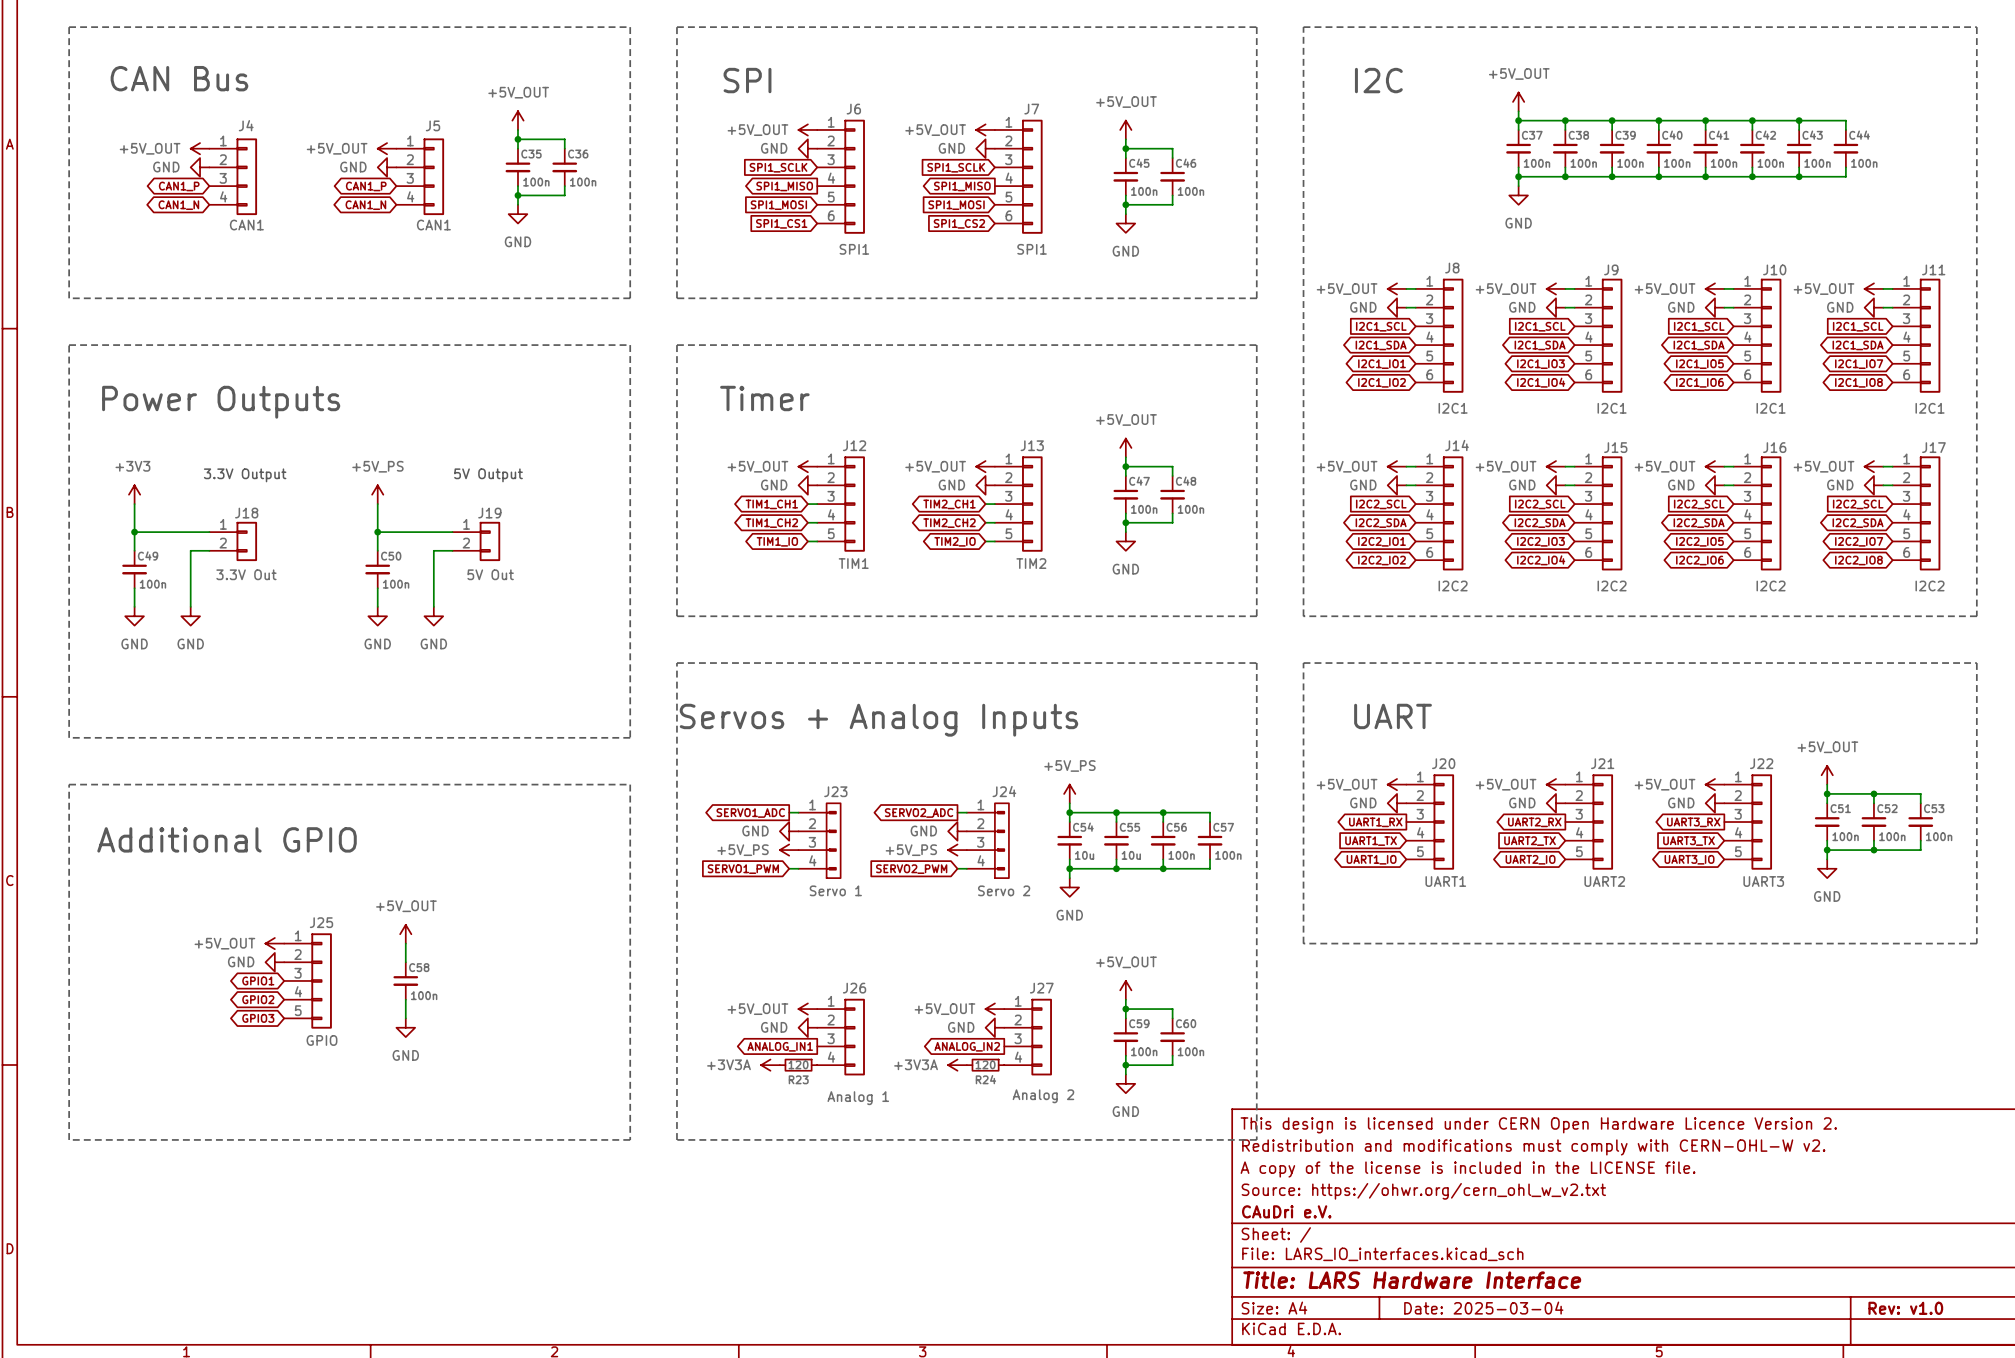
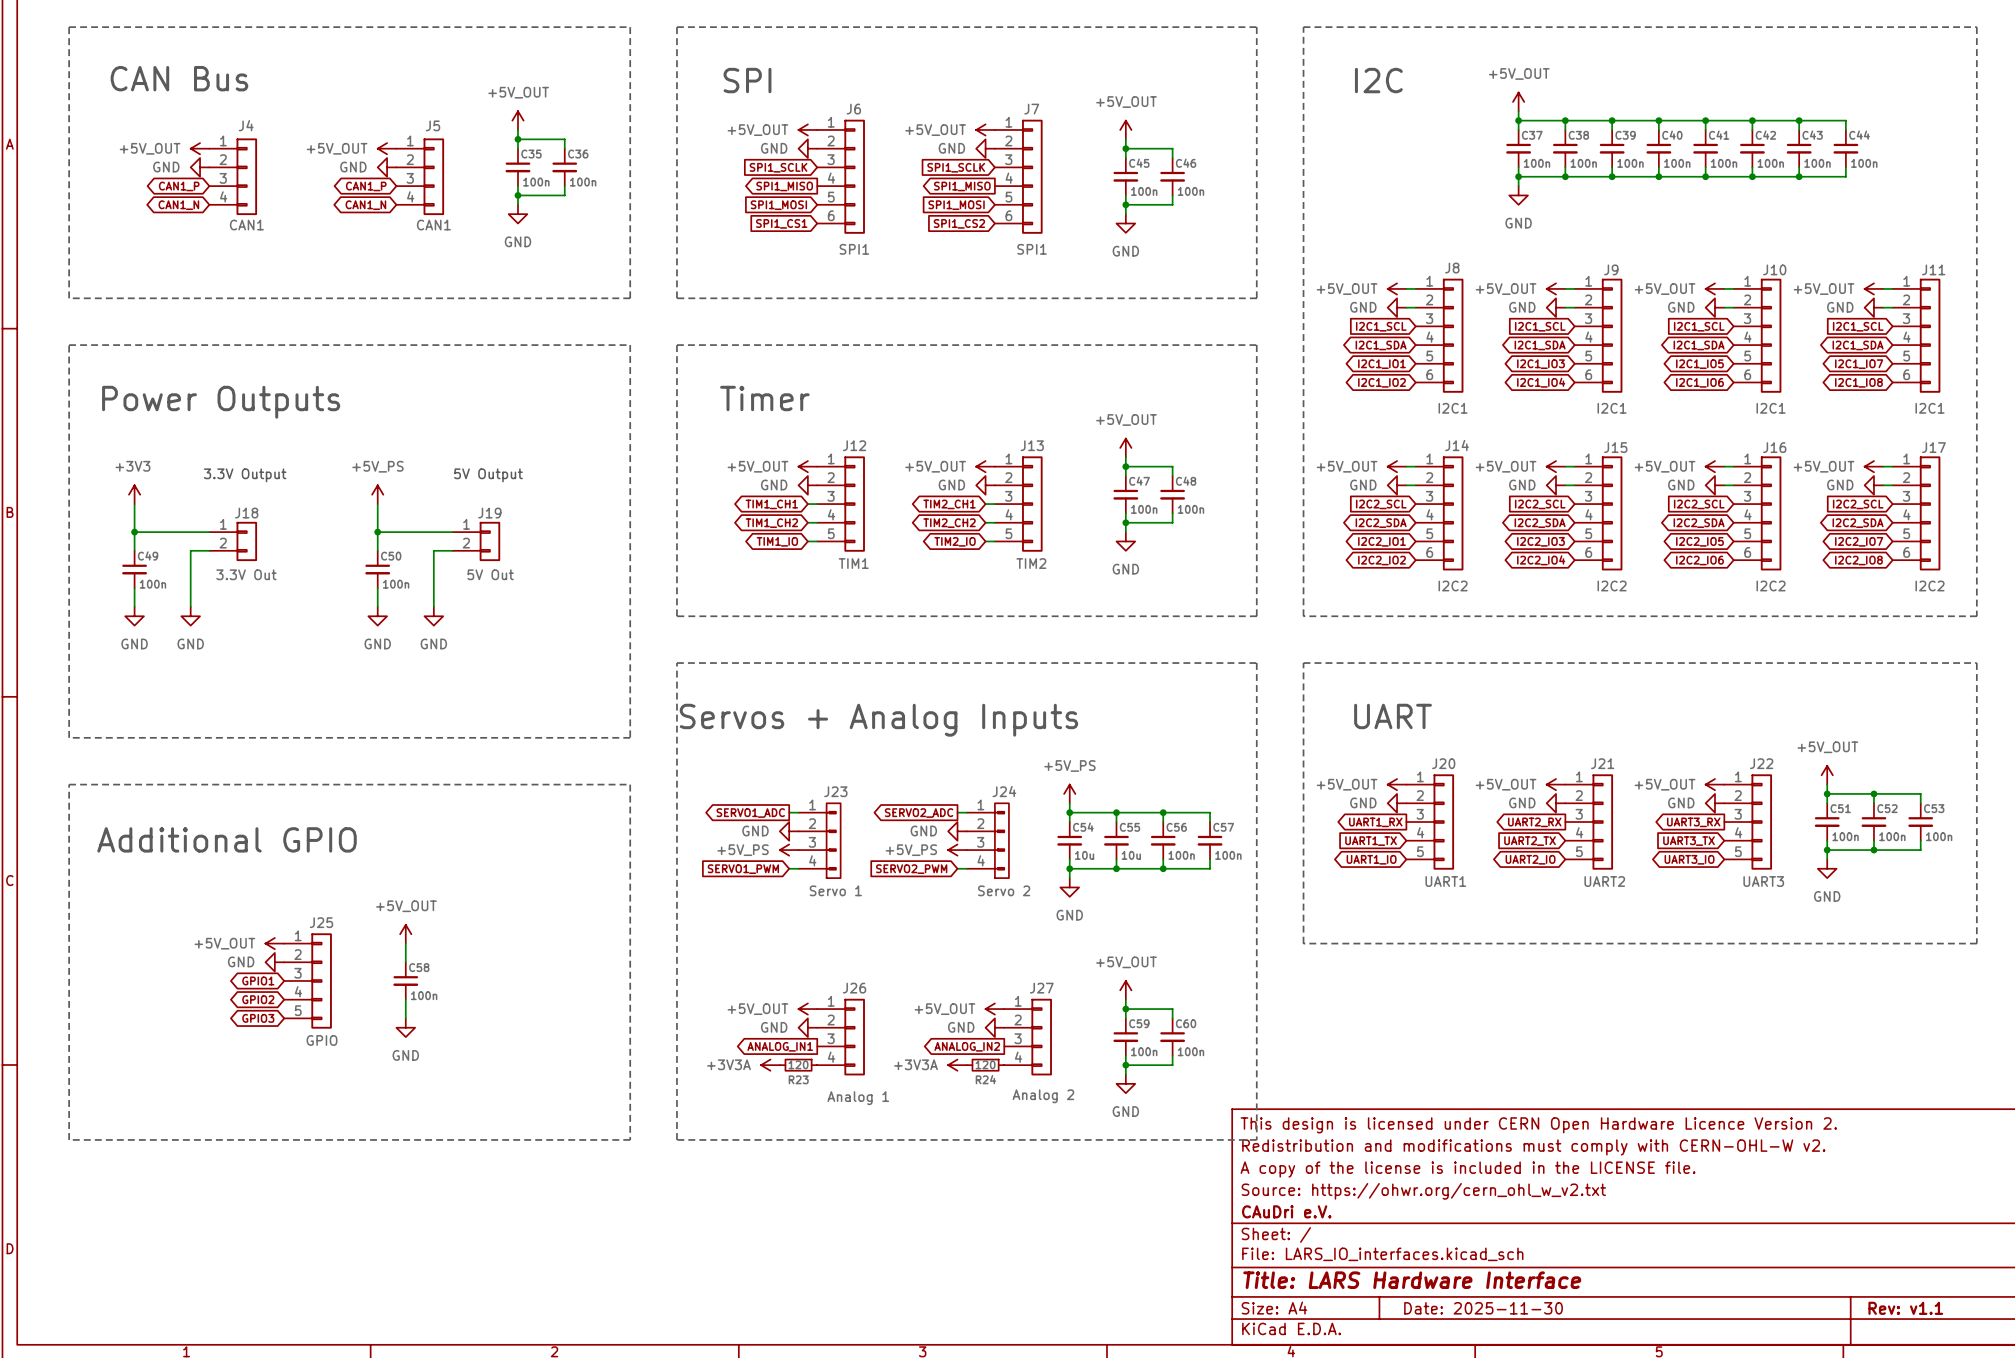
title block: Date: 2025-03-04 (1483, 1308) -> Date: 2025-11-30 (1483, 1308)
title block: Rev: v1.0 (1905, 1308) -> Rev: v1.1 (1905, 1308)

